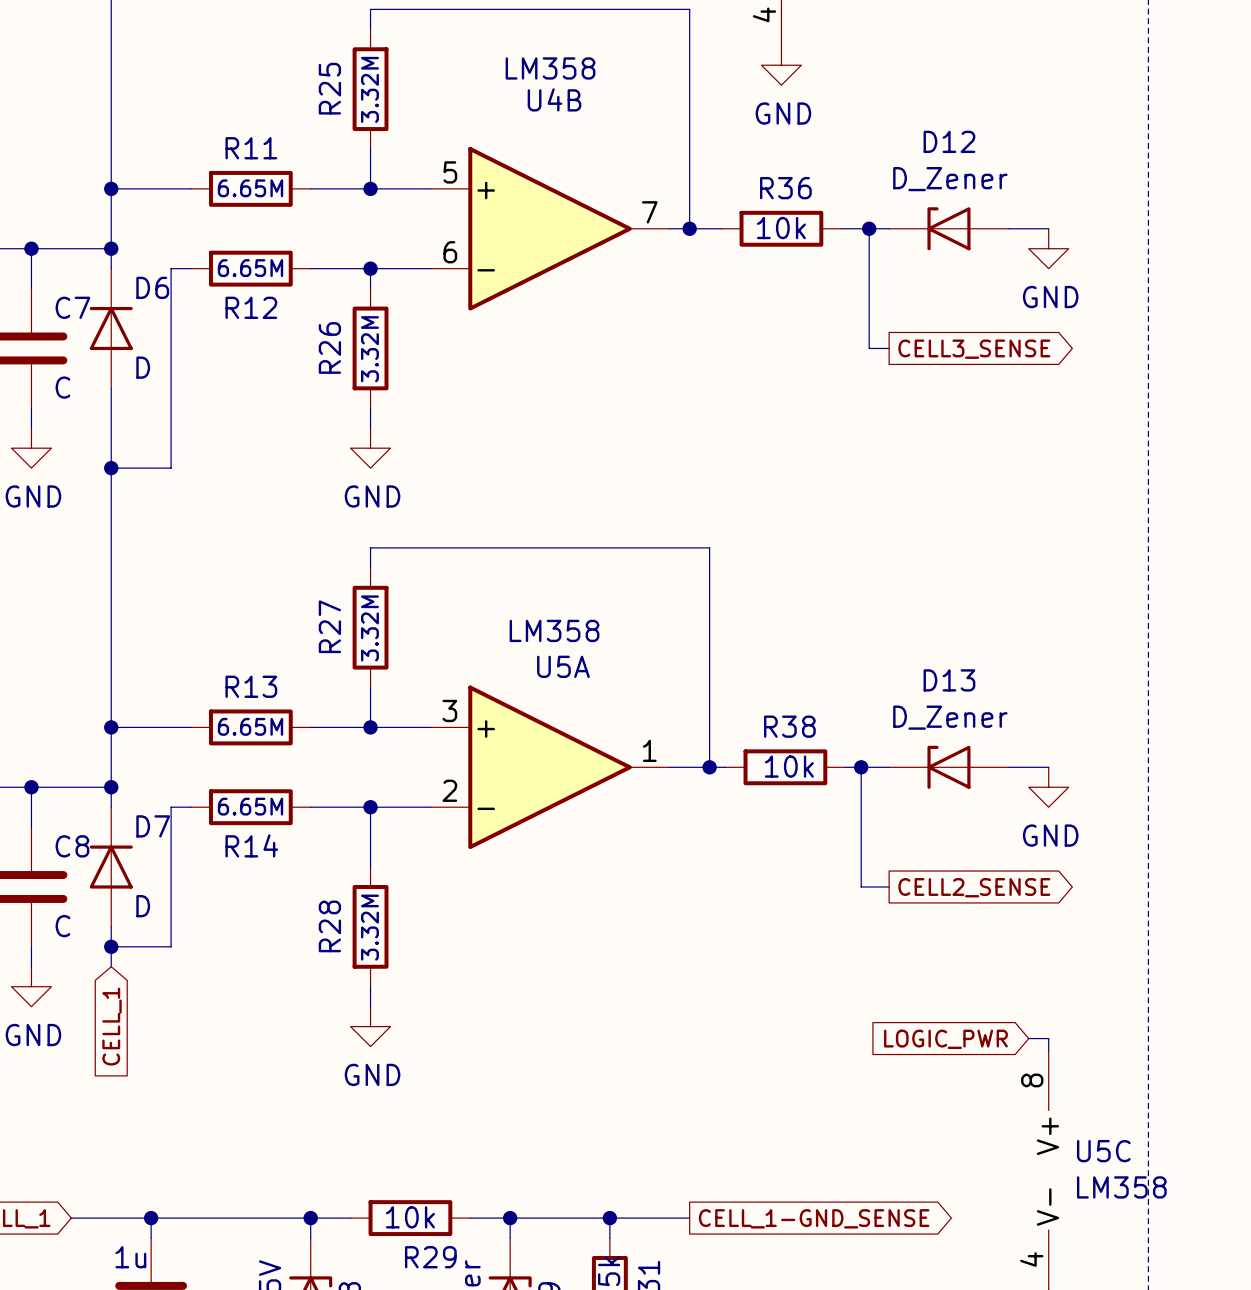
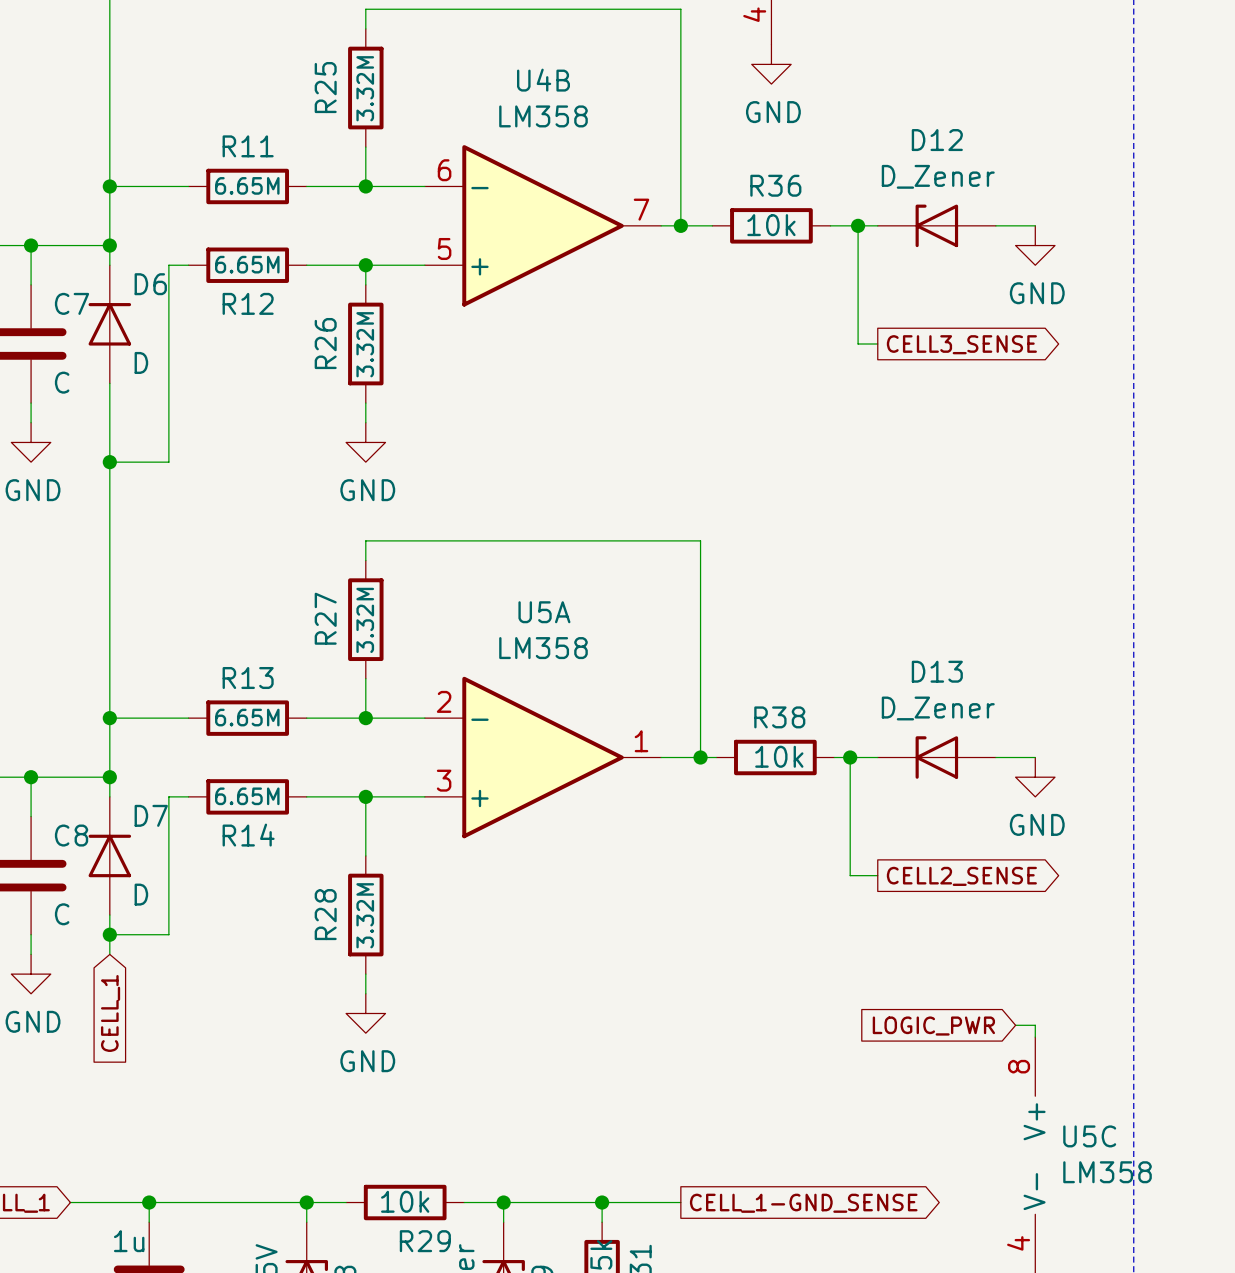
U4B value position: LM358 (550, 68) -> LM358 (543, 116)
U4B flip: as is (550, 228) -> up-down (543, 225)
U5A name position: U5A (563, 666) -> U5A (544, 612)
U5A flip: as is (550, 767) -> up-down (543, 757)

